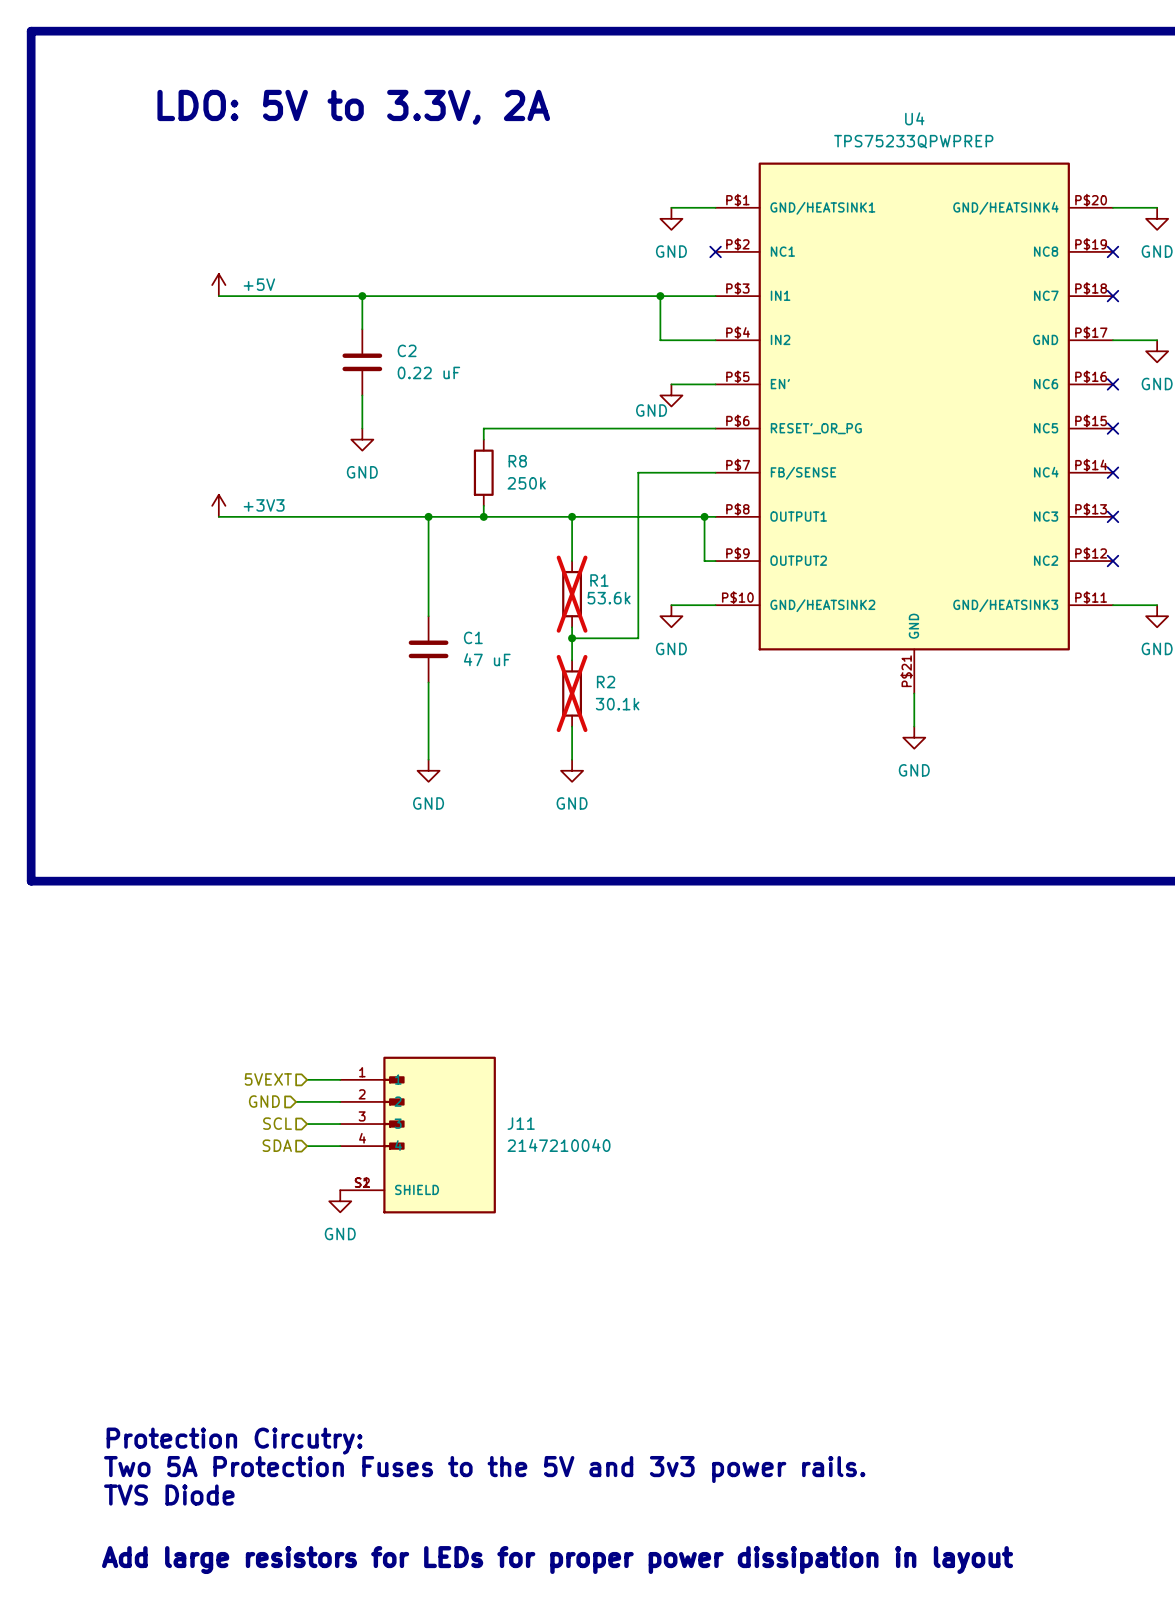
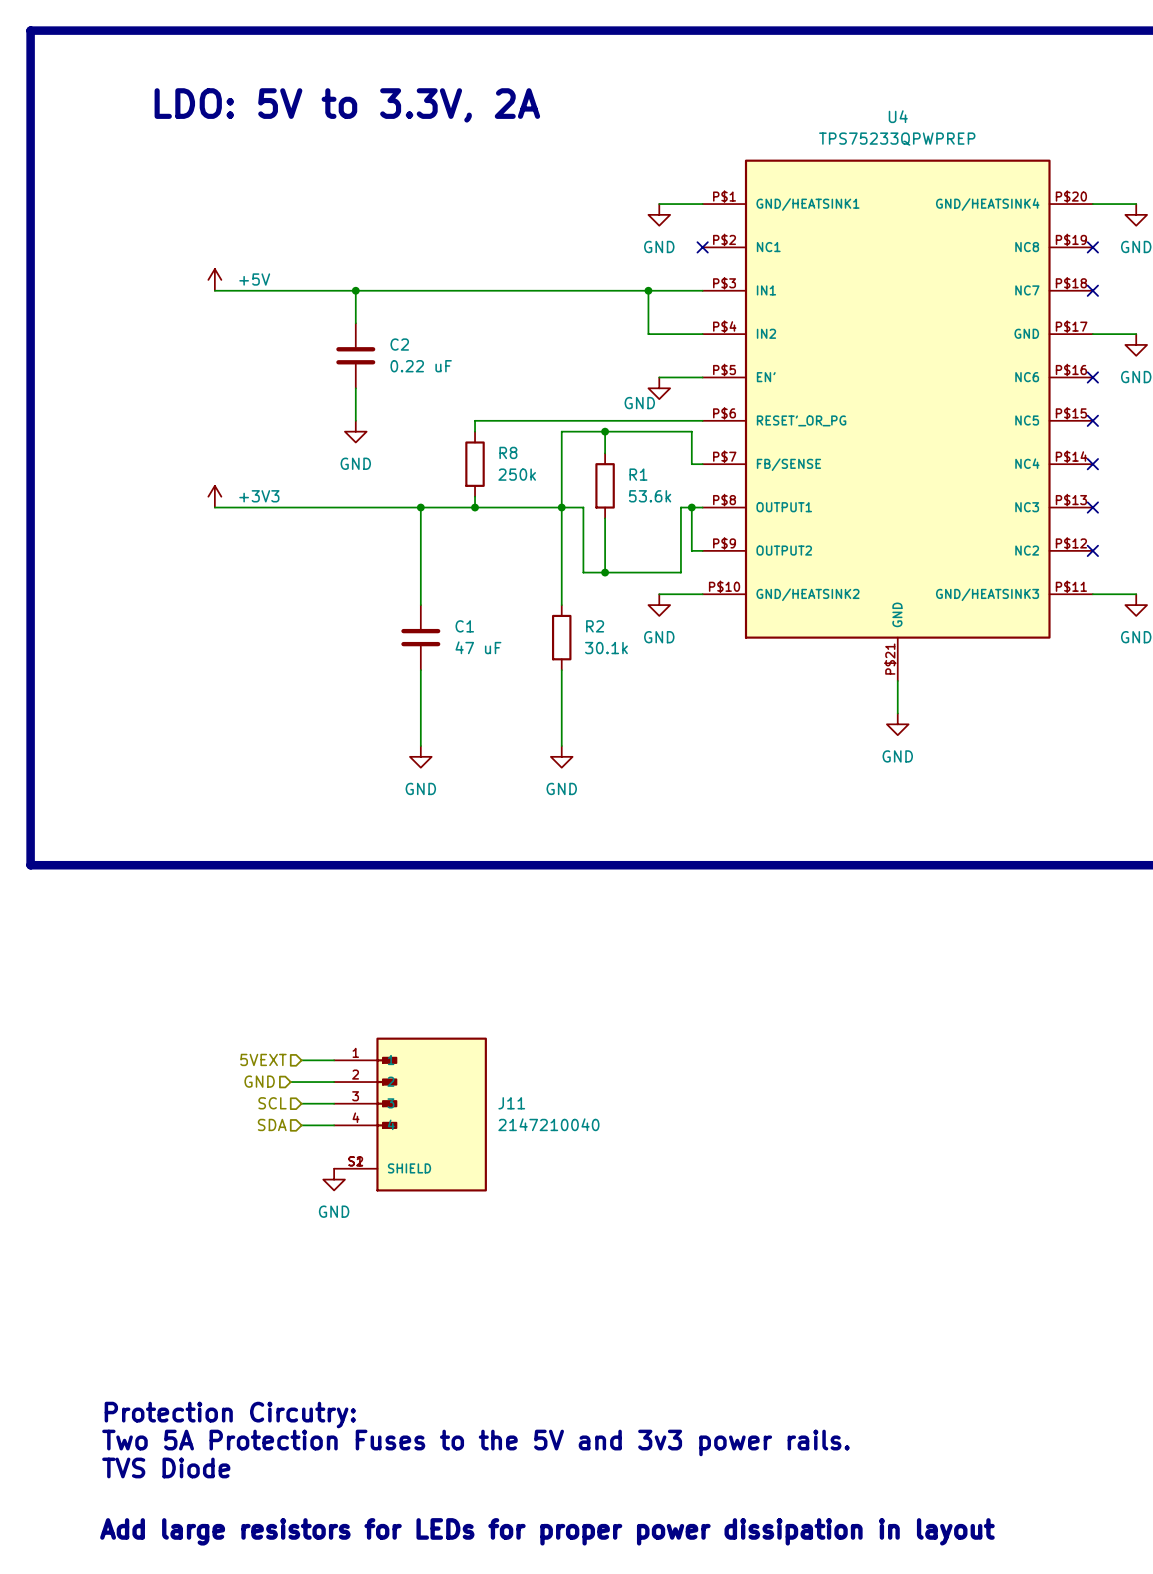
wire: none -> (605, 431) (605, 453)
junction: none -> (605, 431)
wire: (704, 472) (638, 472) (638, 638) (572, 638) -> (691, 464) (691, 431) (561, 431) (561, 507)
wire: (594, 516) (693, 516) -> (583, 507) (583, 572) (680, 572) (680, 507)
wire: none -> (605, 518) (605, 572)
wire: none -> (561, 550) (561, 605)
R1 name position: R1 (599, 580) -> R1 (638, 474)
junction: none -> (605, 572)
R1 position: (572, 594) -> (605, 485)
R1 do-not-place cross: (572, 594) -> none
R1 value position: 53.6k (609, 598) -> 53.6k (650, 496)
wire: (572, 627) (572, 660) -> none
junction: (572, 638) -> none
R2 position: (572, 693) -> (561, 637)
R2 do-not-place cross: (572, 693) -> none

